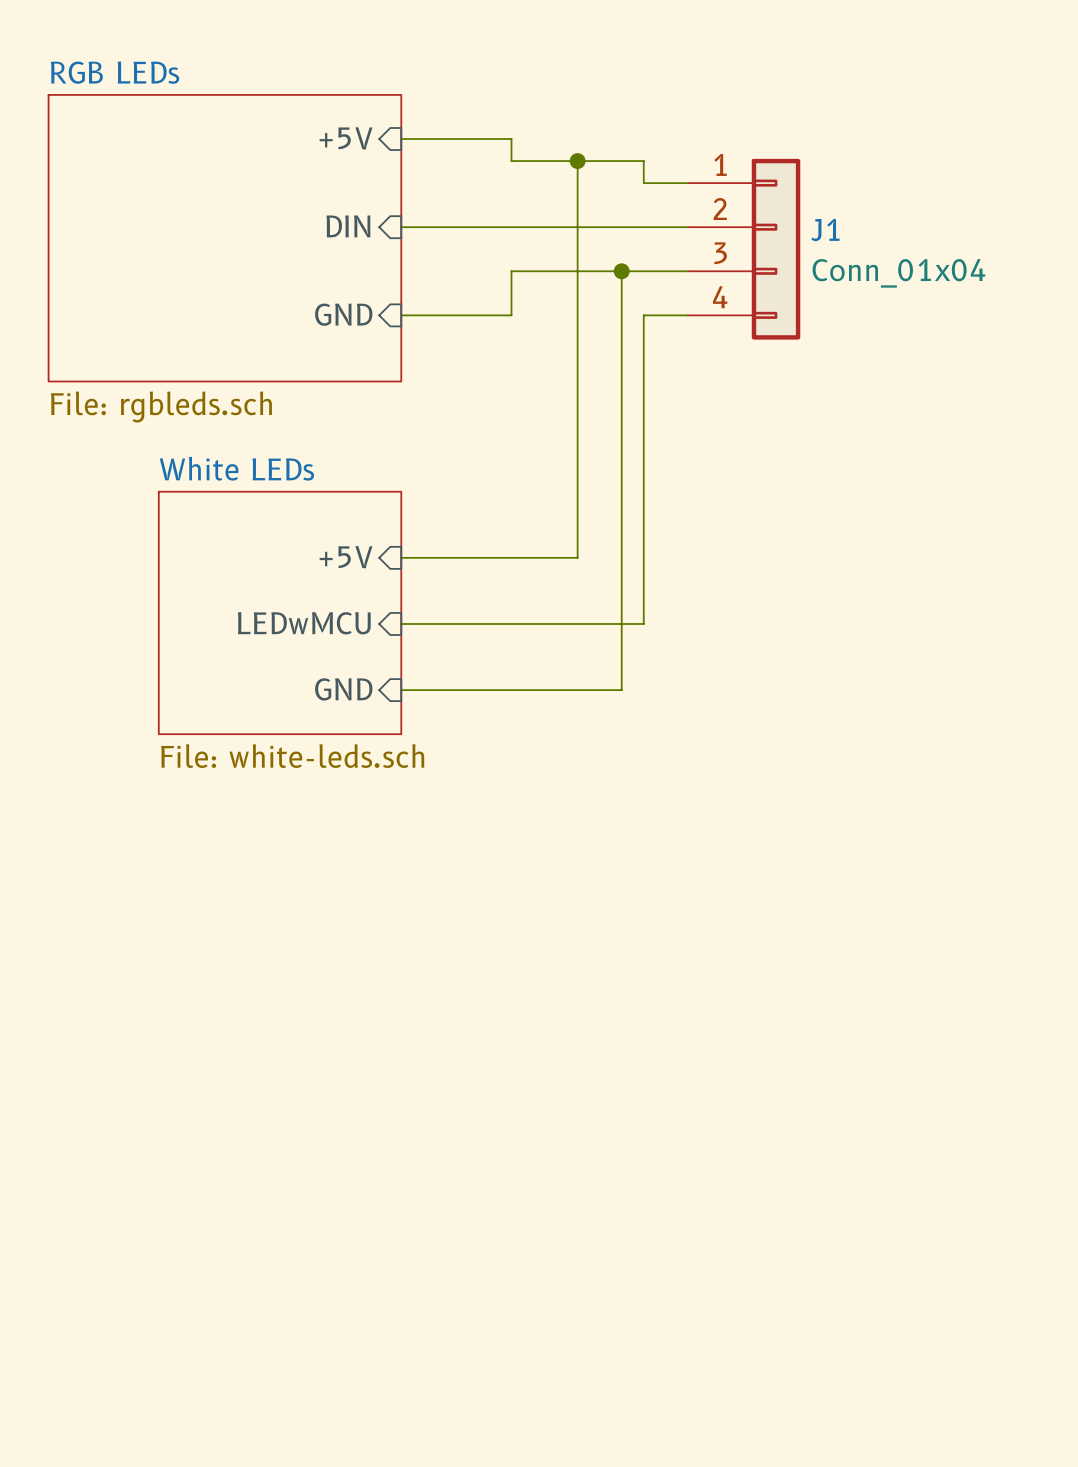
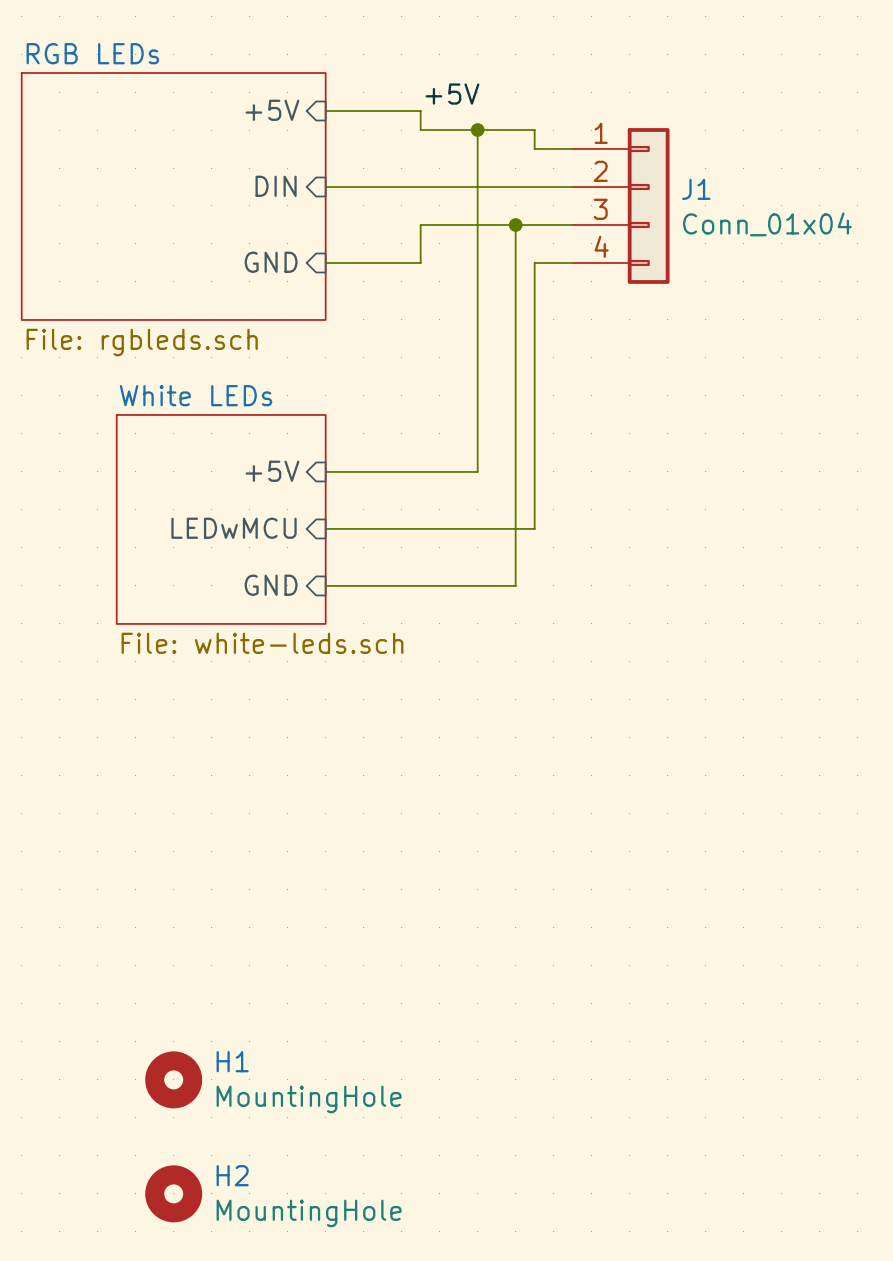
label: none -> +5V (452, 94)
H1: none -> MountingHole (173, 1079)
H2: none -> MountingHole (173, 1193)

